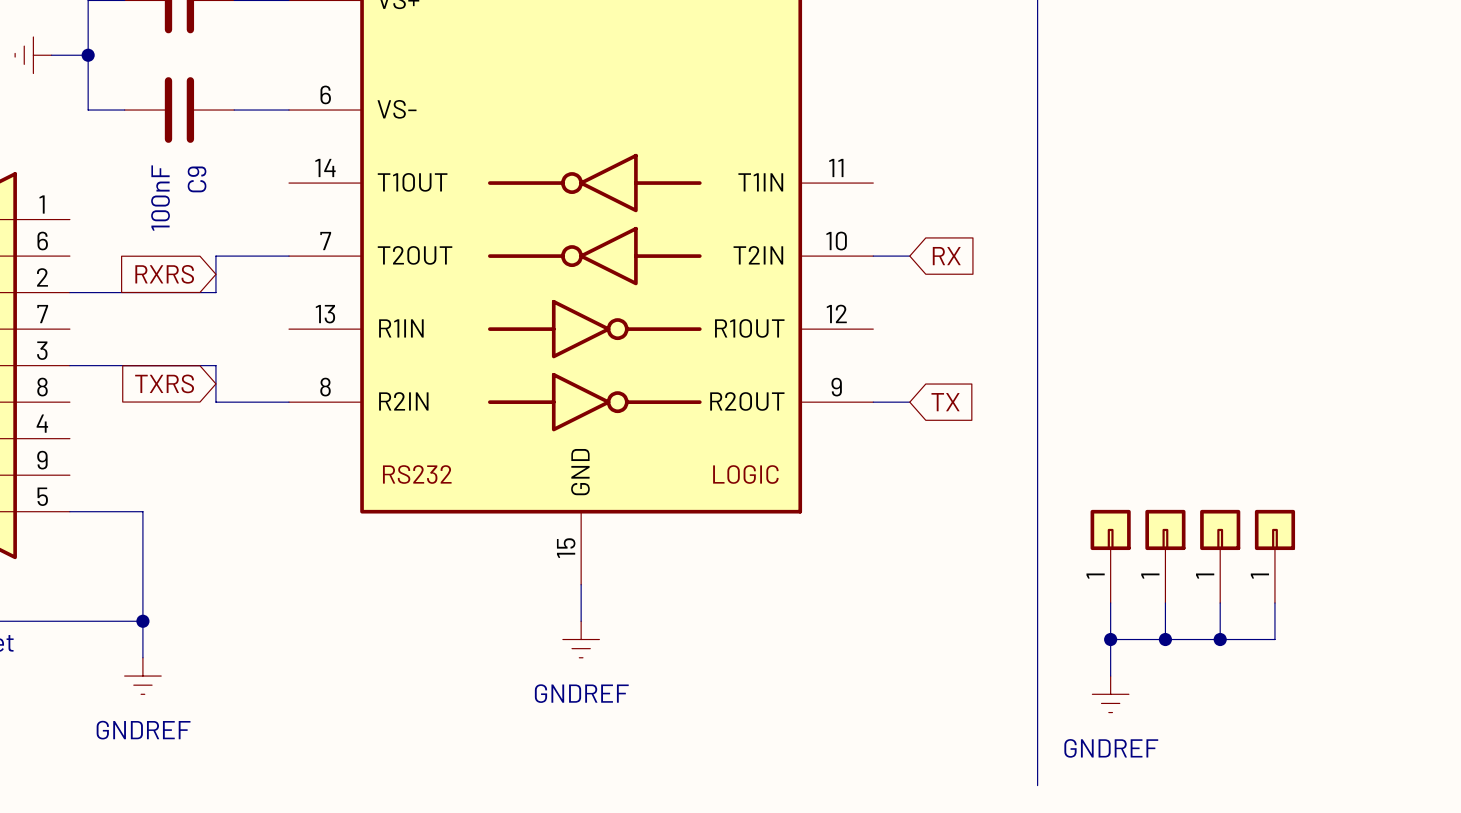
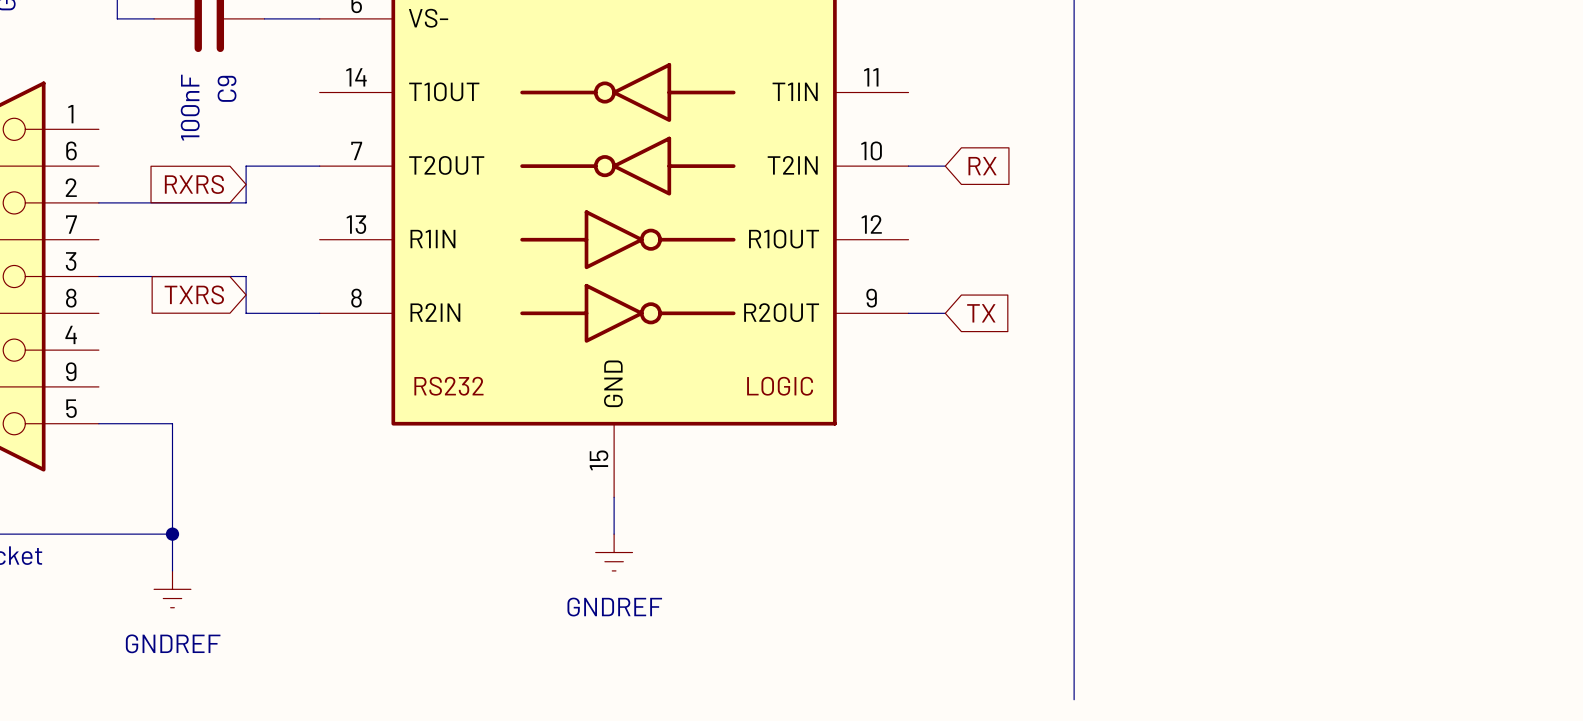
part: (1110, 556) -> none
part: (1165, 556) -> none
part: (1220, 556) -> none
part: (1274, 556) -> none
wire: (1110, 603) (1110, 676) -> none
wire: (1165, 603) (1165, 639) -> none
wire: (1220, 603) (1220, 639) -> none
wire: (1274, 603) (1274, 639) (1110, 639) -> none
junction: (1110, 639) -> none
junction: (1165, 639) -> none
junction: (1220, 639) -> none
power symbol: GNDREF (1110, 694) -> none

